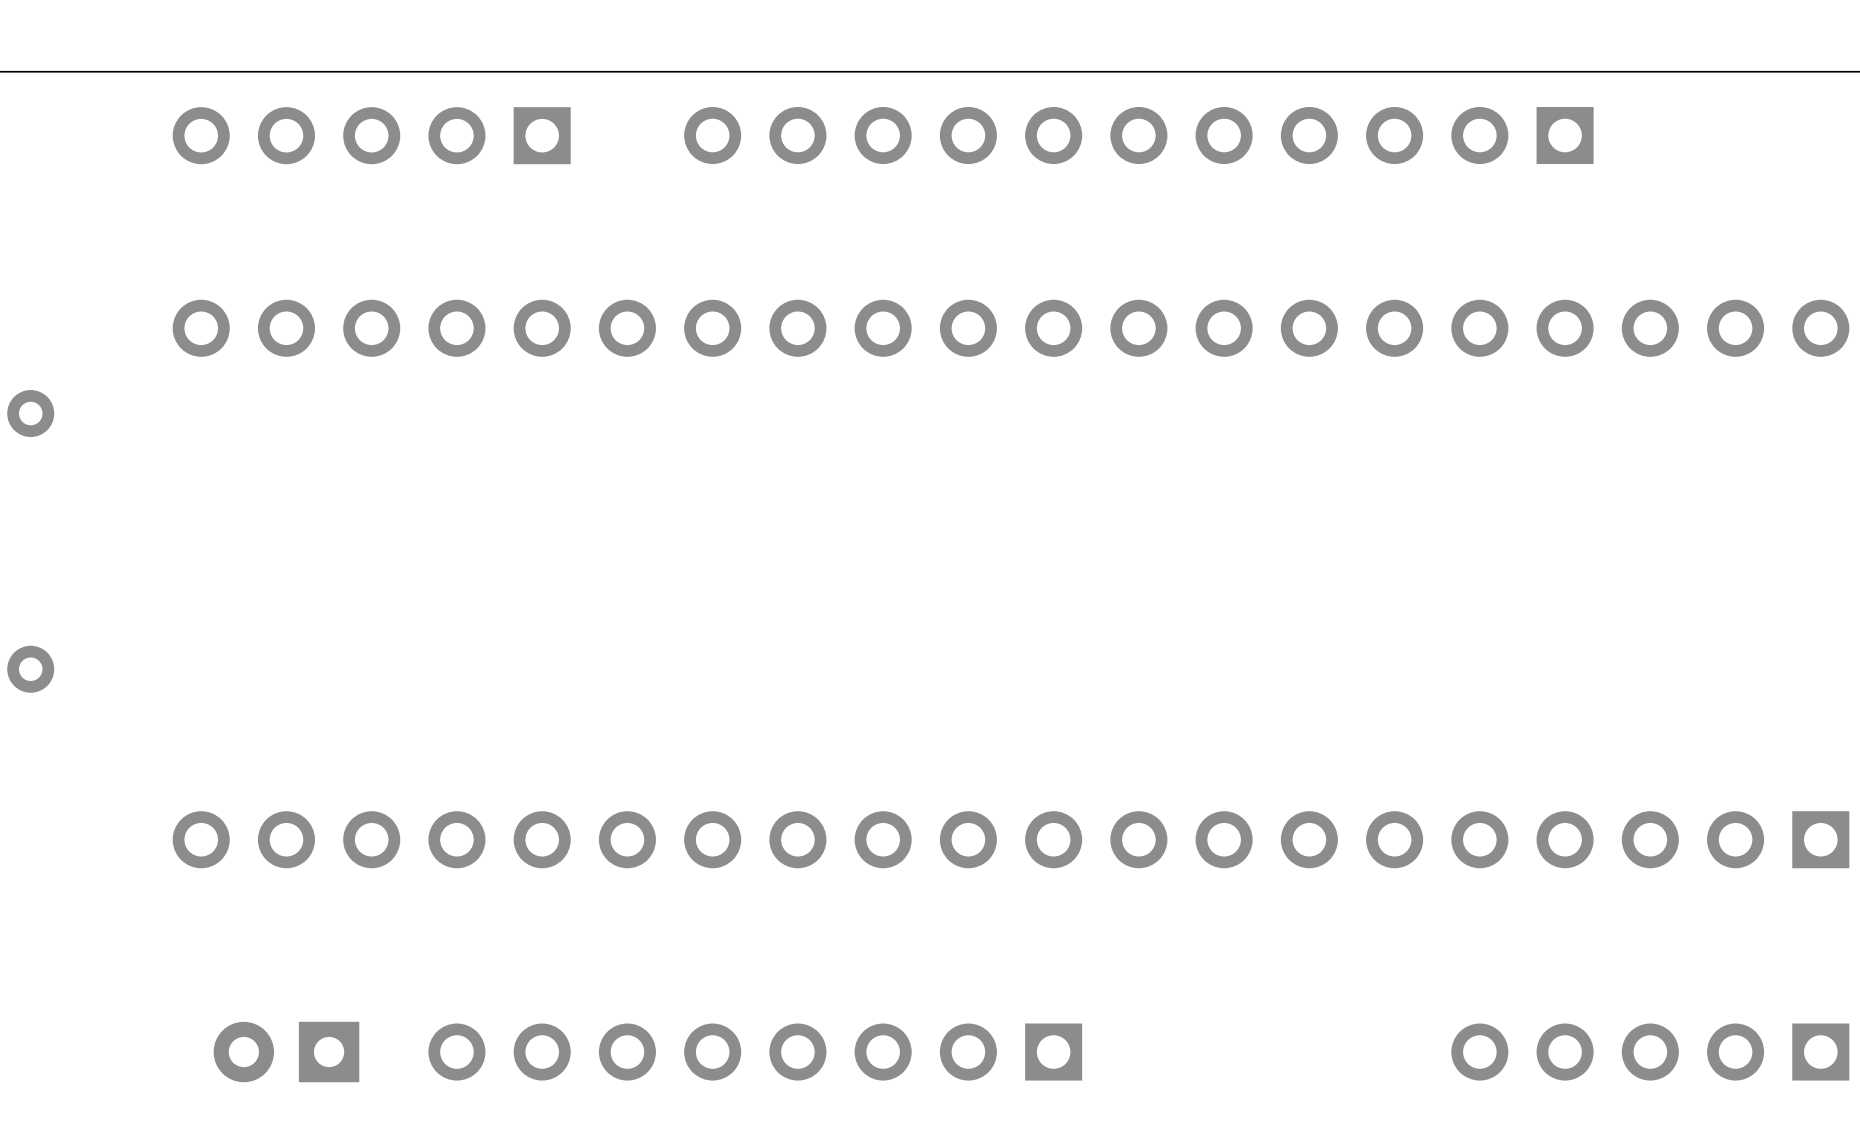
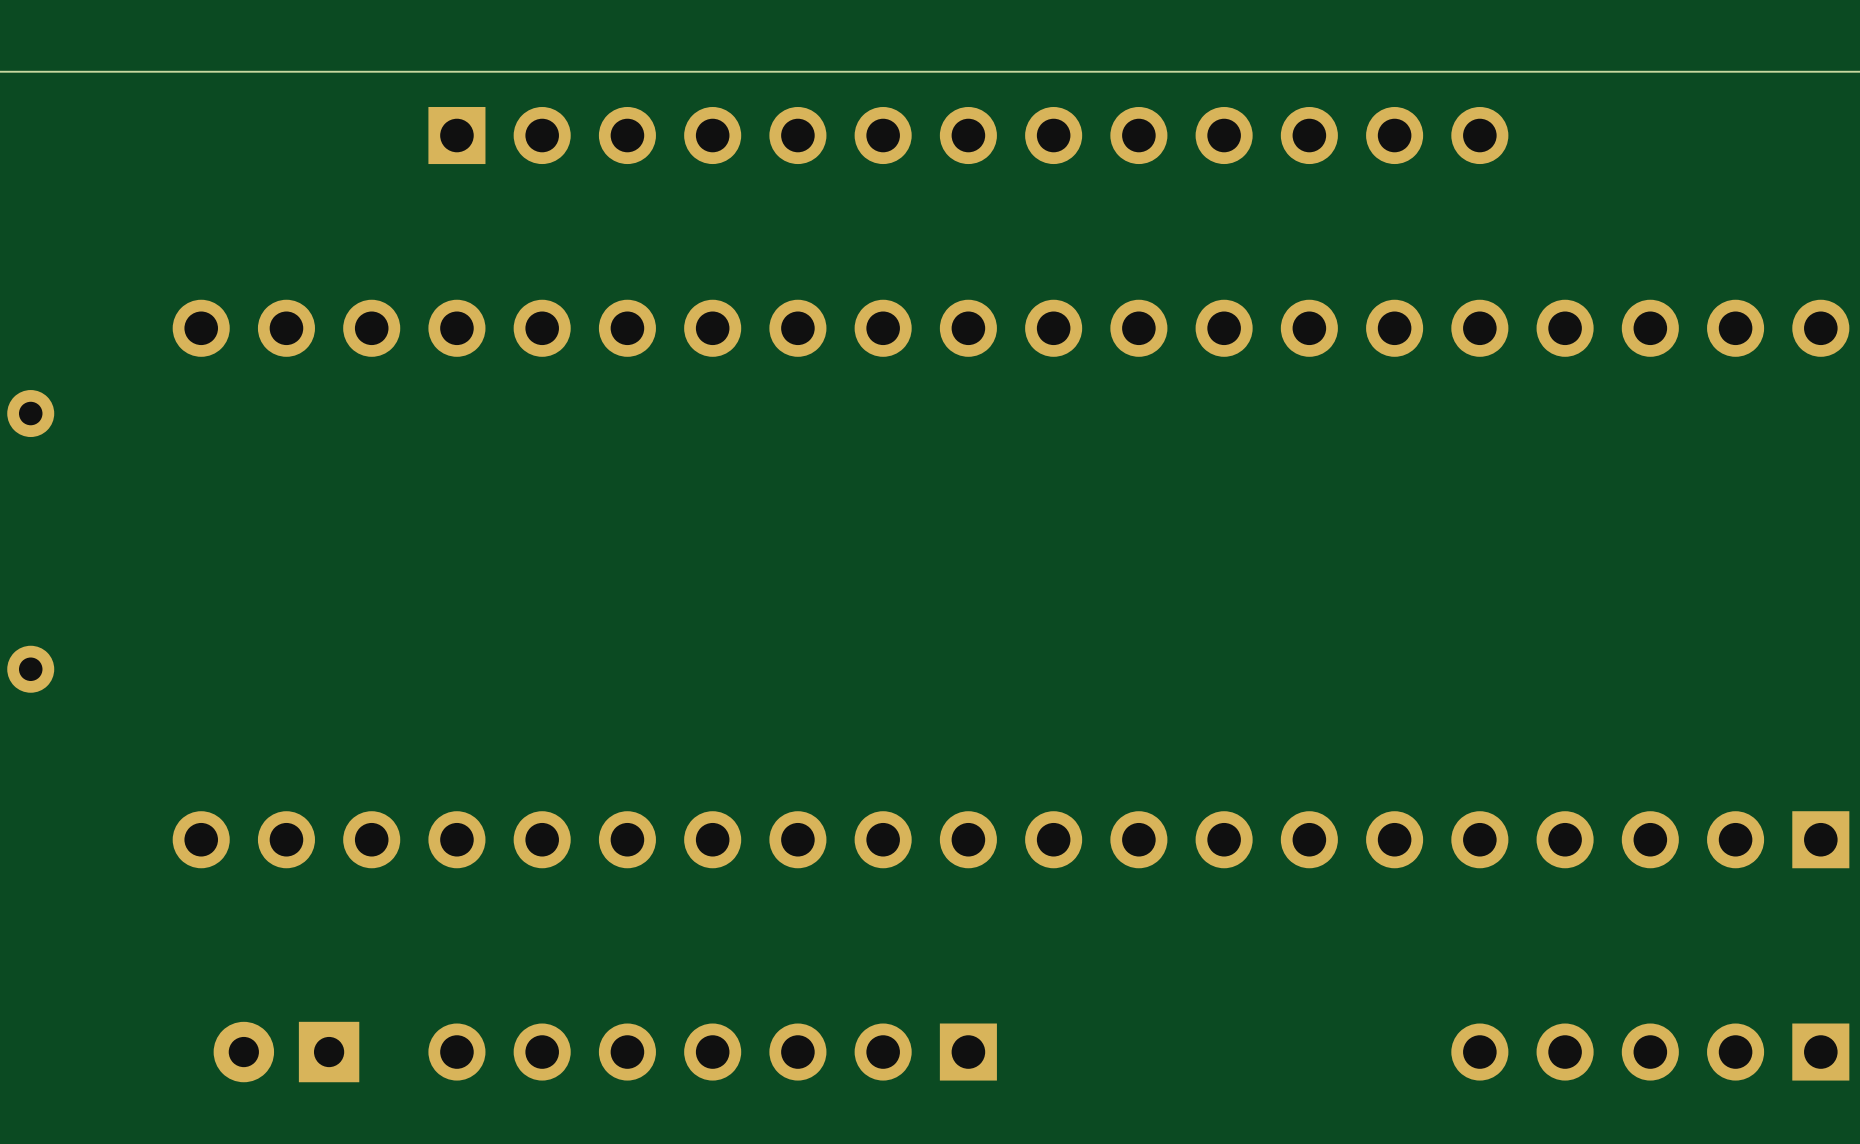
part: (371, 135) -> none
part: none -> (968, 135)
part: (1138, 135) -> none
part: none -> (712, 1052)
part: (755, 1052) -> none

